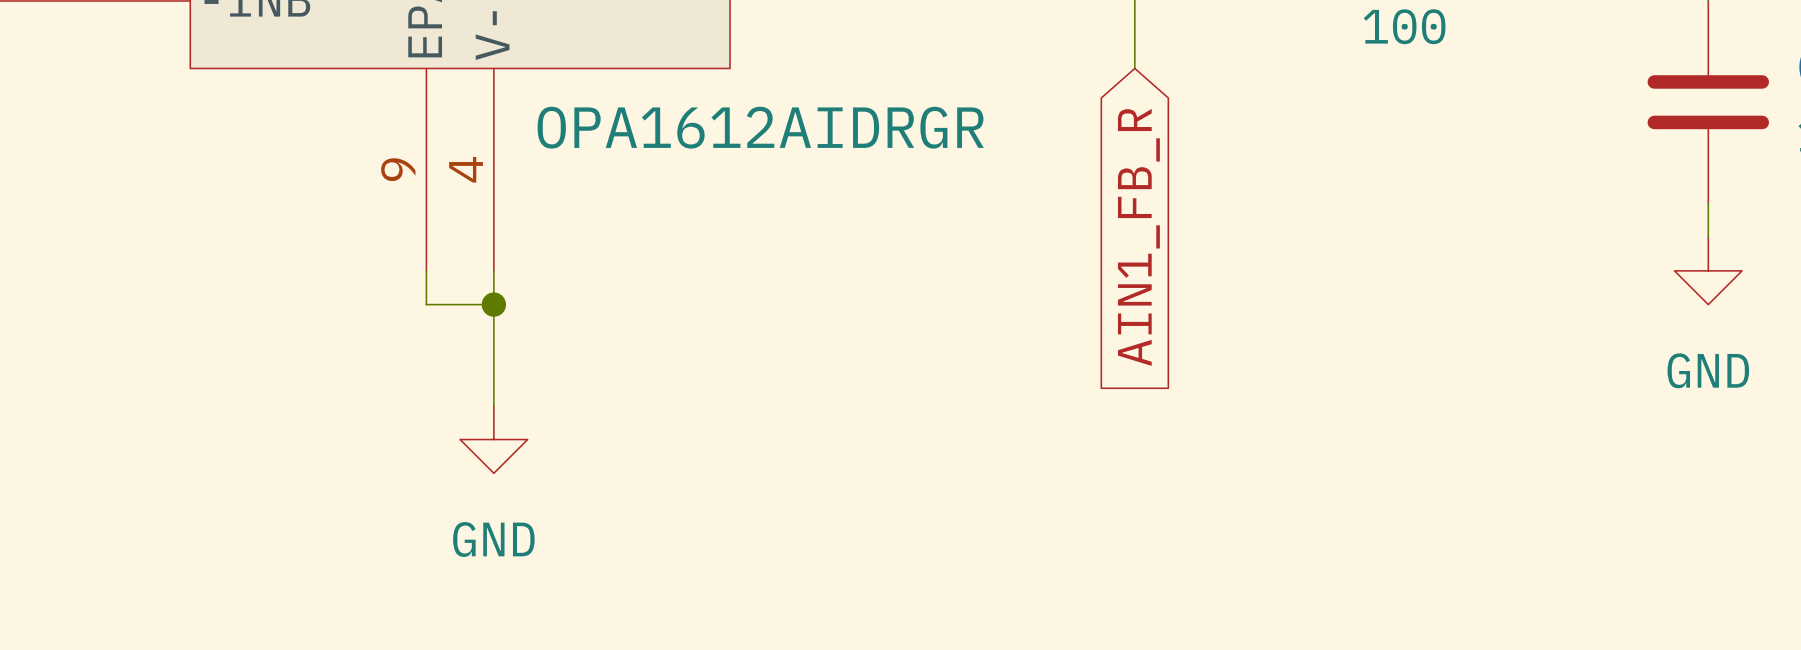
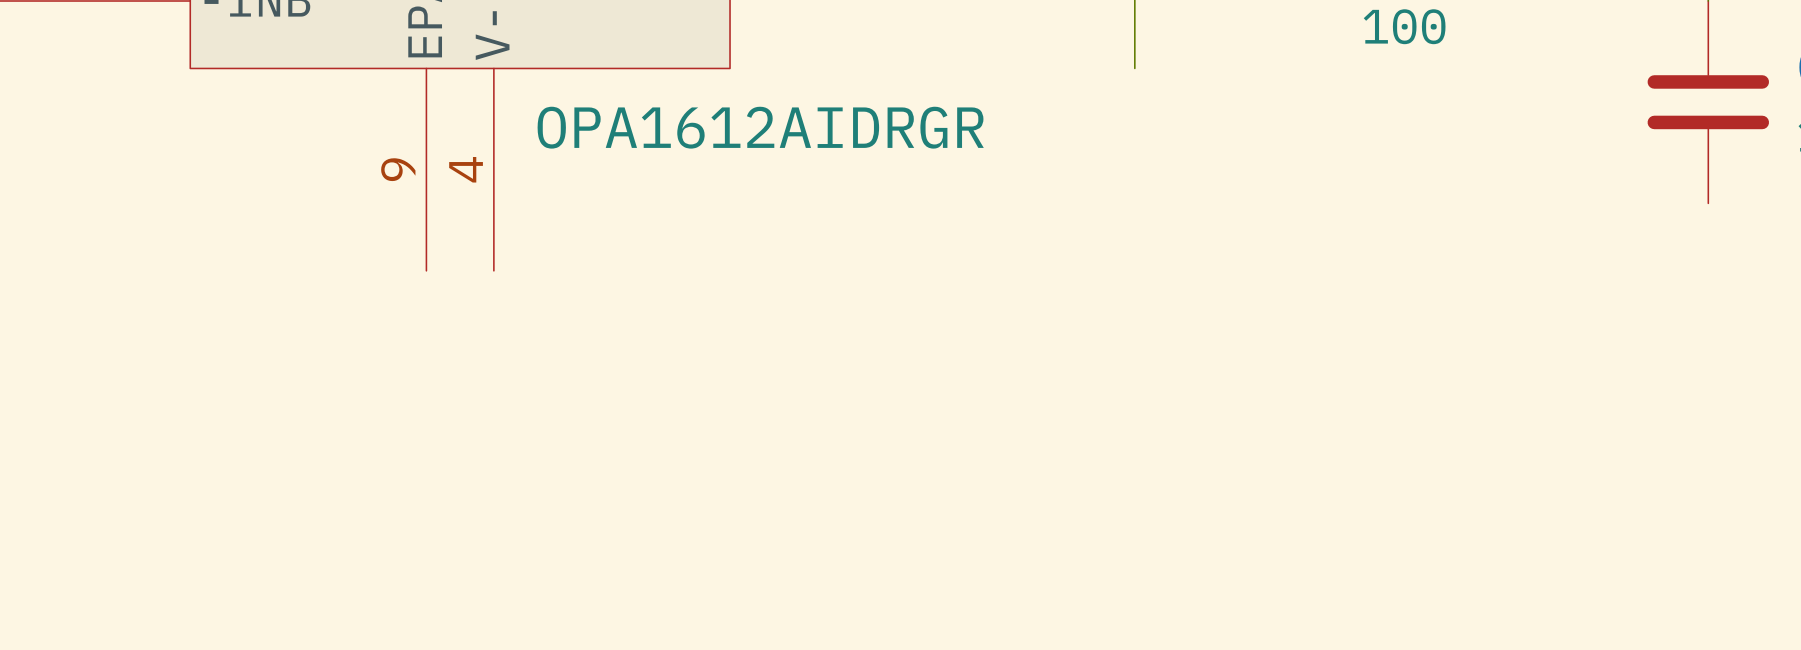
wire: (1708, 203) (1708, 237) -> none
global label: AIN1_FB_R (1138, 237) -> none
wire: (426, 270) (426, 304) (493, 304) -> none
wire: (493, 270) (493, 405) -> none
power symbol: GND (1708, 270) -> none
junction: (493, 304) -> none
power symbol: GND (493, 439) -> none

